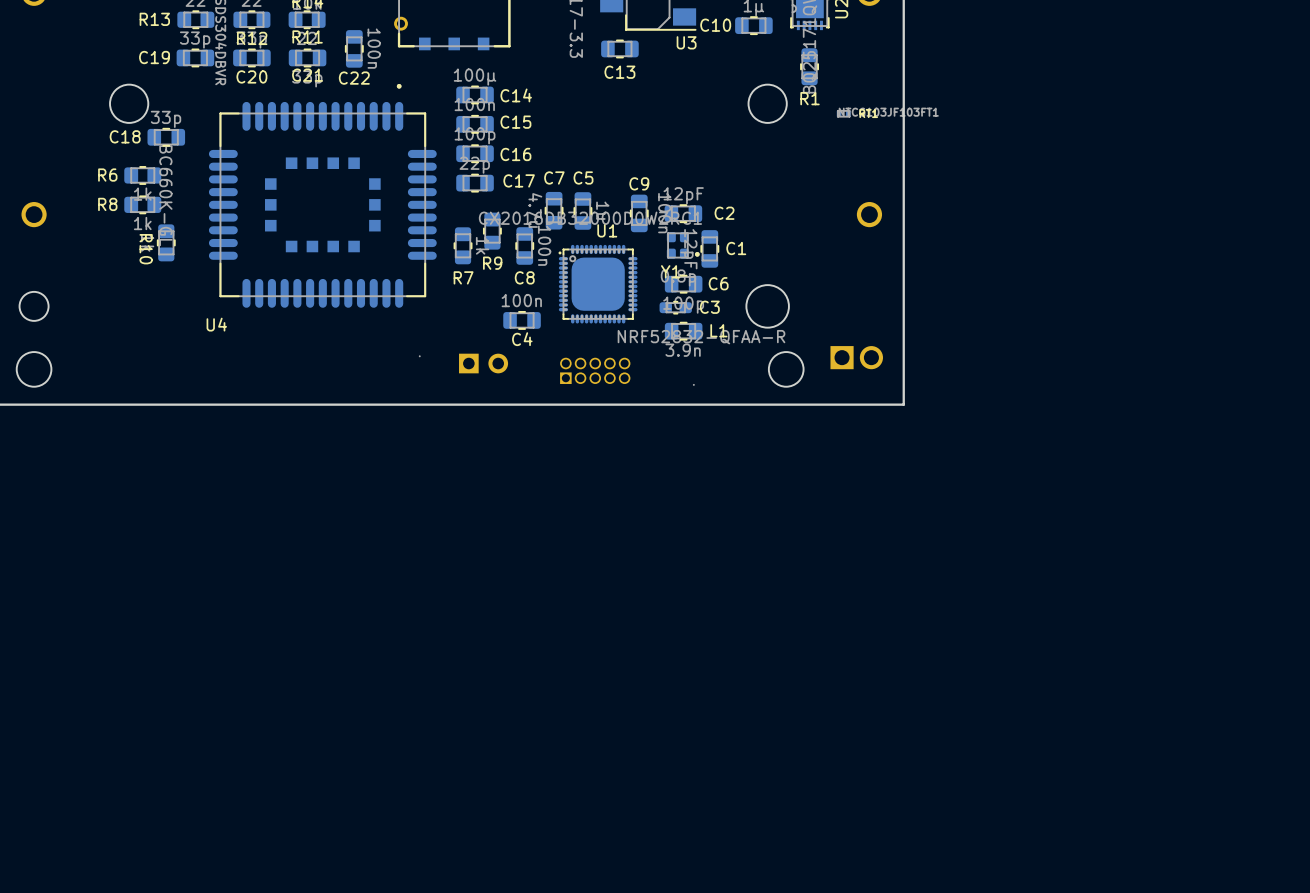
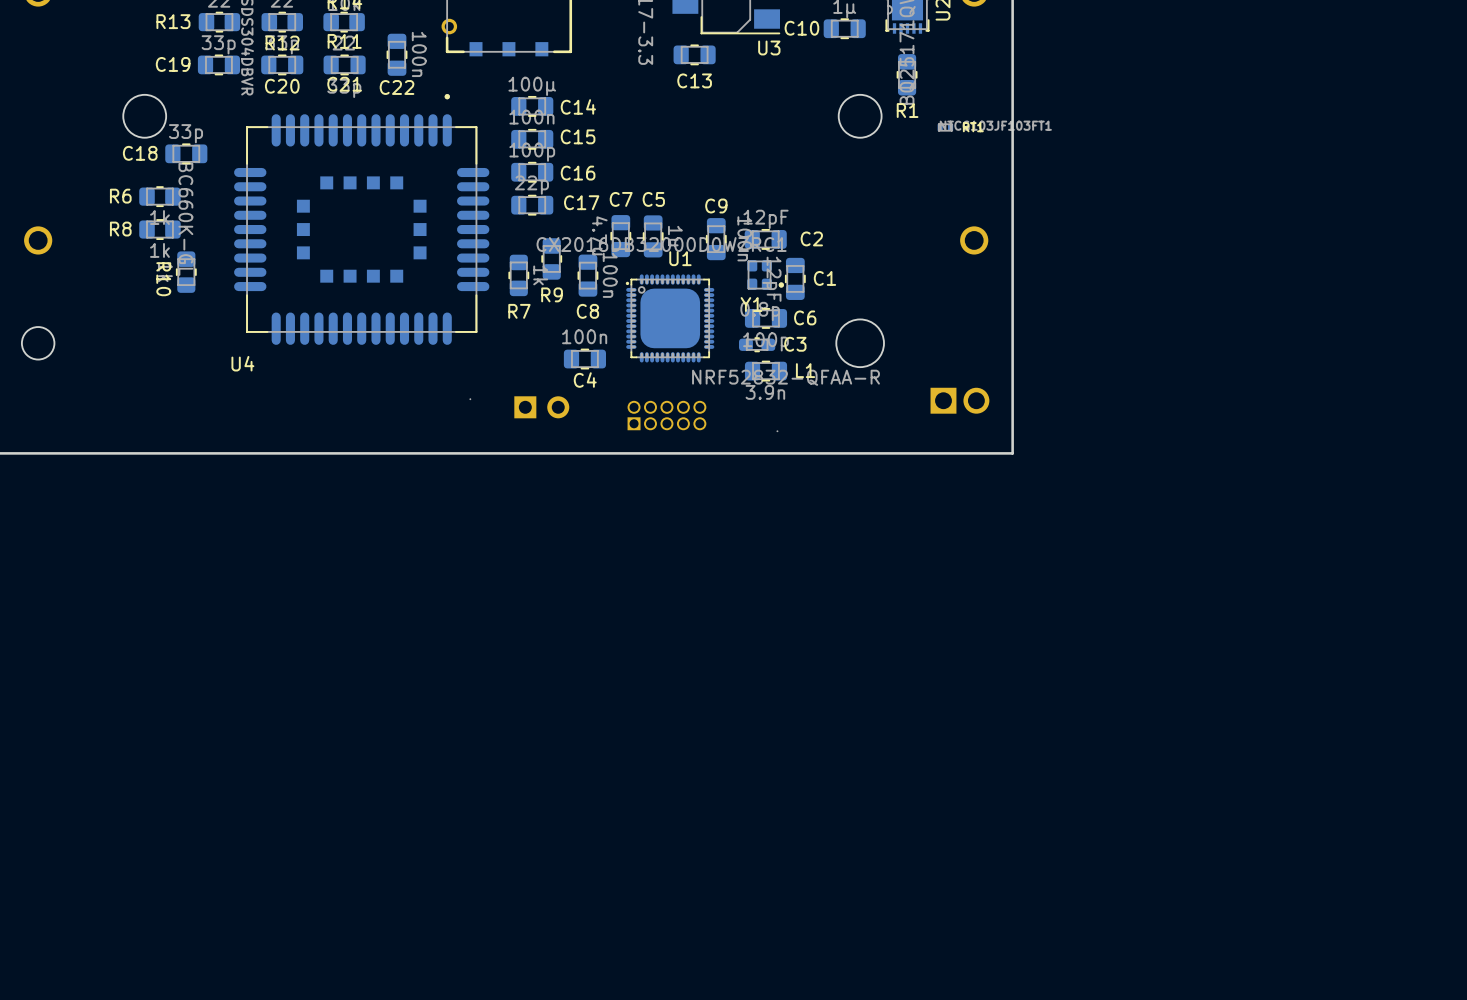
round board edge: [15, 351, 53, 388] -> none
round board edge: [768, 351, 805, 388] -> none

